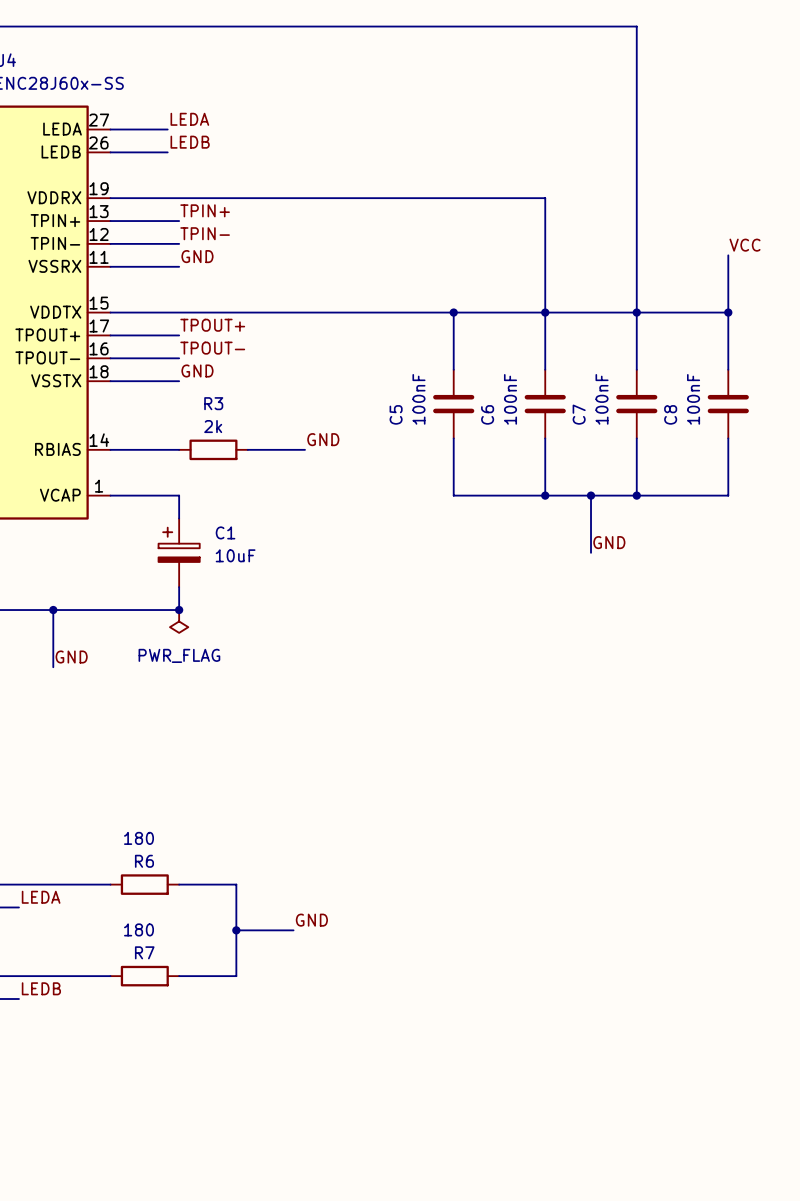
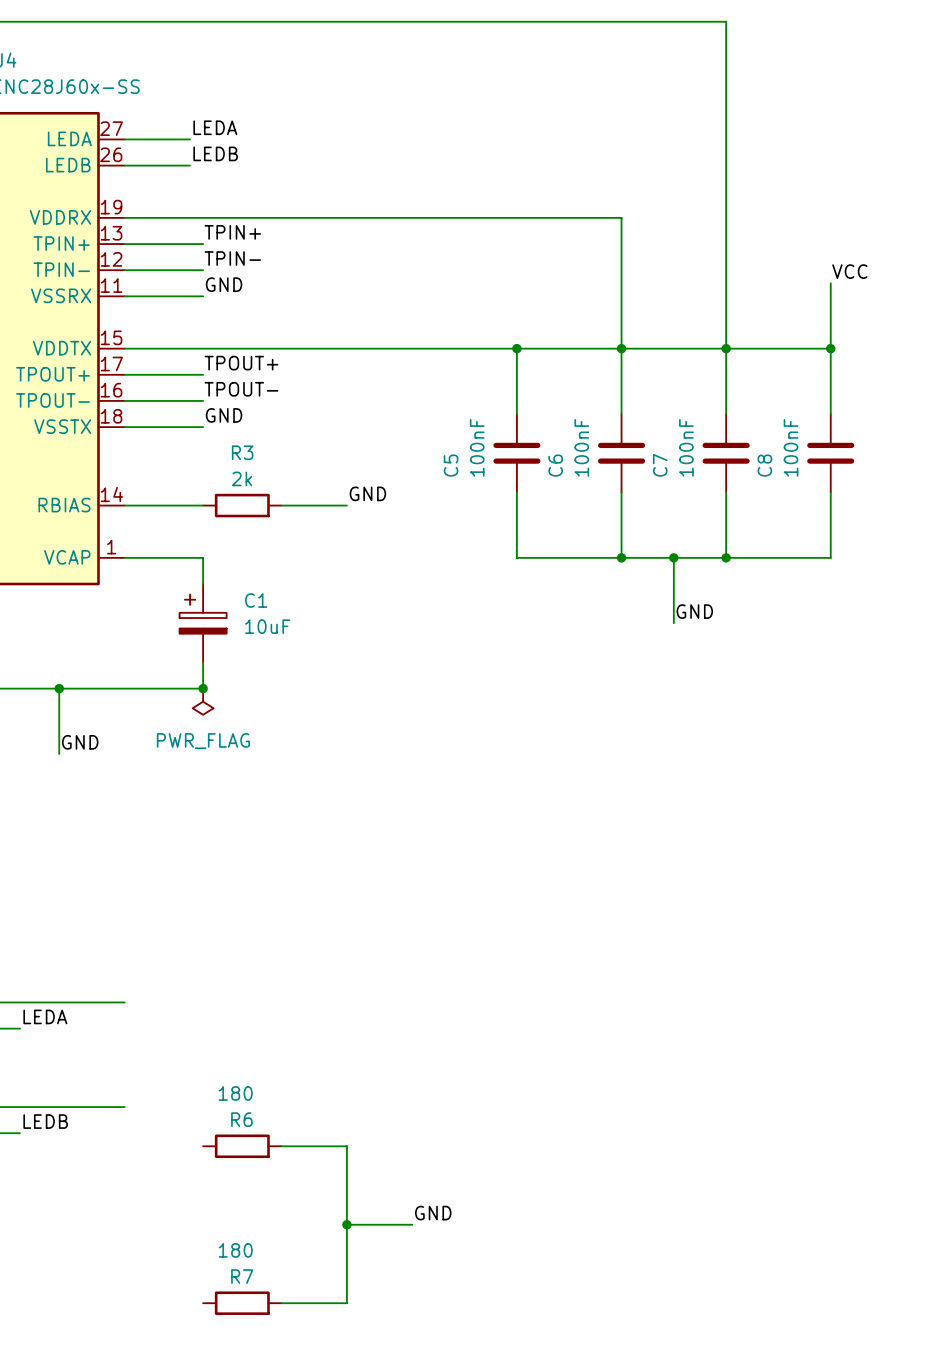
R6 position: (144, 884) -> (242, 1146)
wire: (179, 884) (236, 884) (236, 976) (179, 976) -> none
label position: GND (311, 920) -> GND (433, 1213)
wire: (236, 930) (293, 930) -> (346, 1224) (412, 1224)
junction: (236, 930) -> none
R7 position: (144, 976) -> (242, 1303)
wire: none -> (281, 1146) (346, 1146) (346, 1303) (281, 1303)
junction: none -> (346, 1224)

